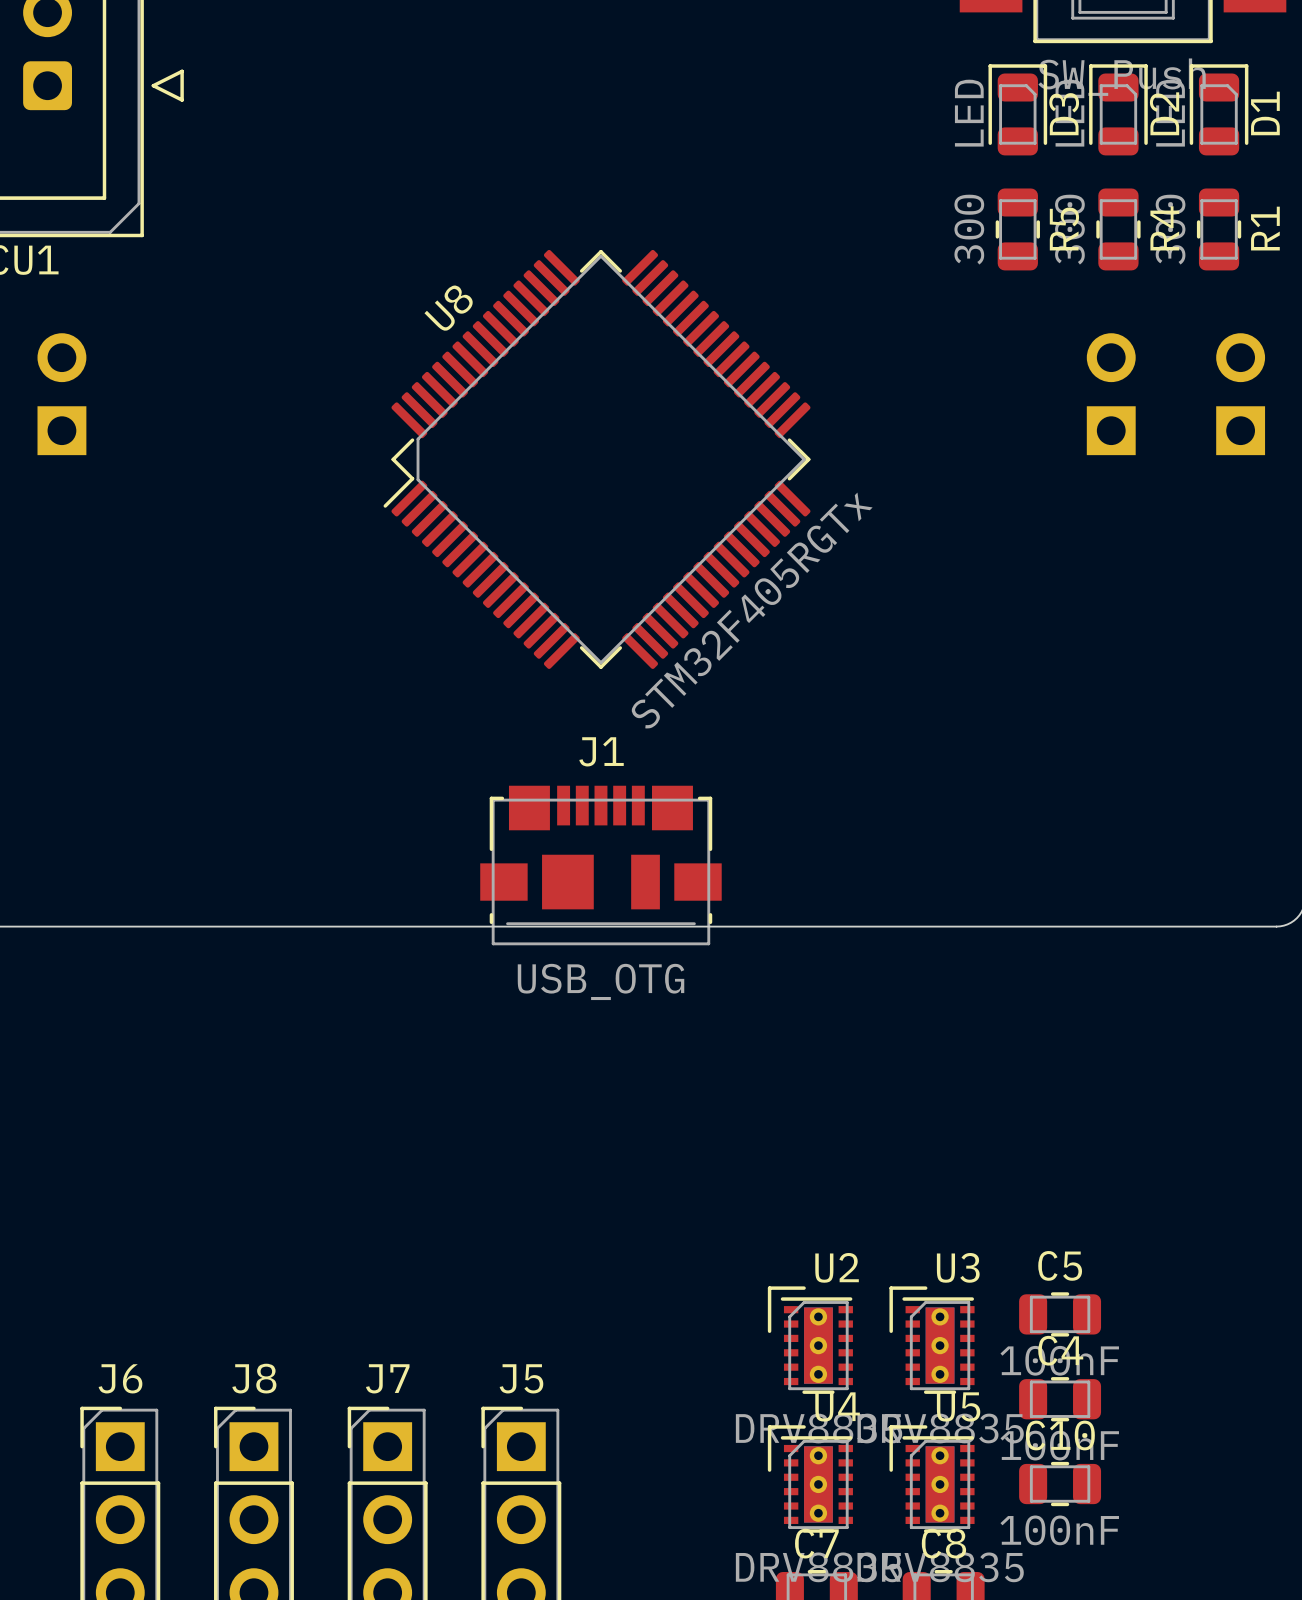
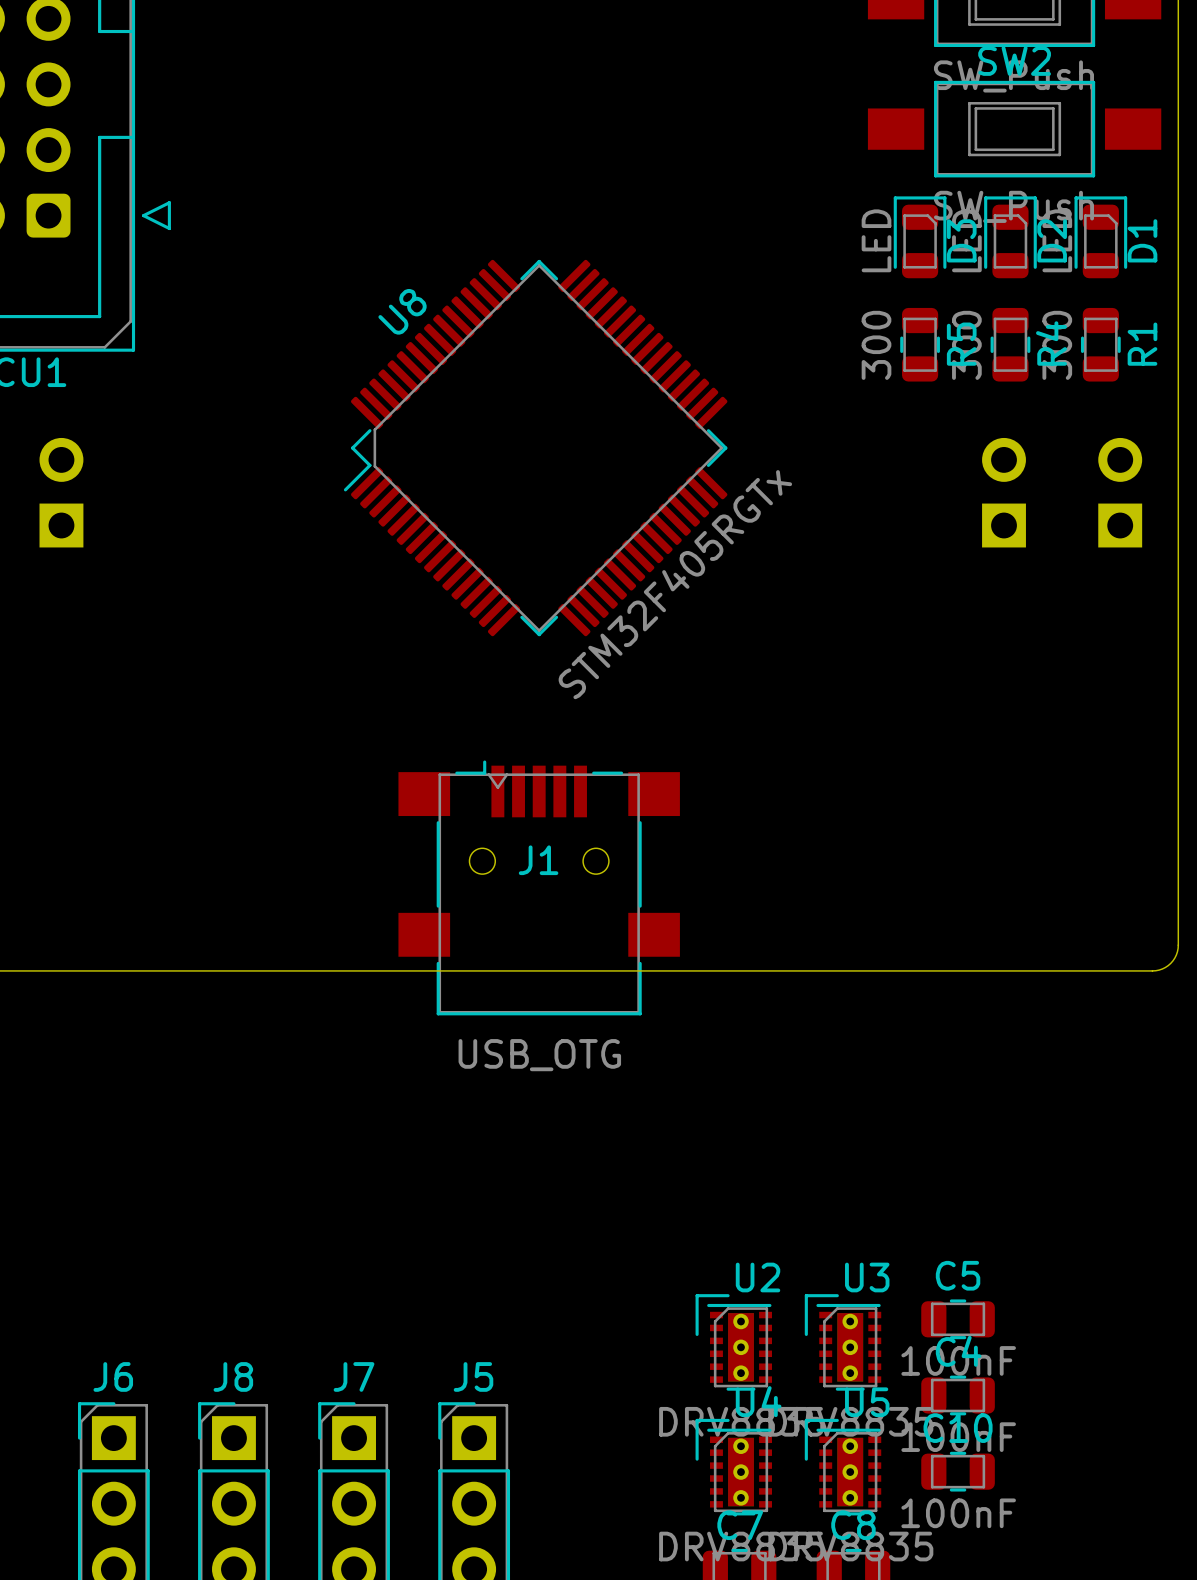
U8 position: (597, 459) -> (535, 448)
J1 name position: J1 (601, 751) -> J1 (538, 860)
J1 footprint: [480, 785, 722, 946] -> [398, 760, 680, 1016]
J1 value position: USB_OTG (601, 981) -> USB_OTG (539, 1055)

